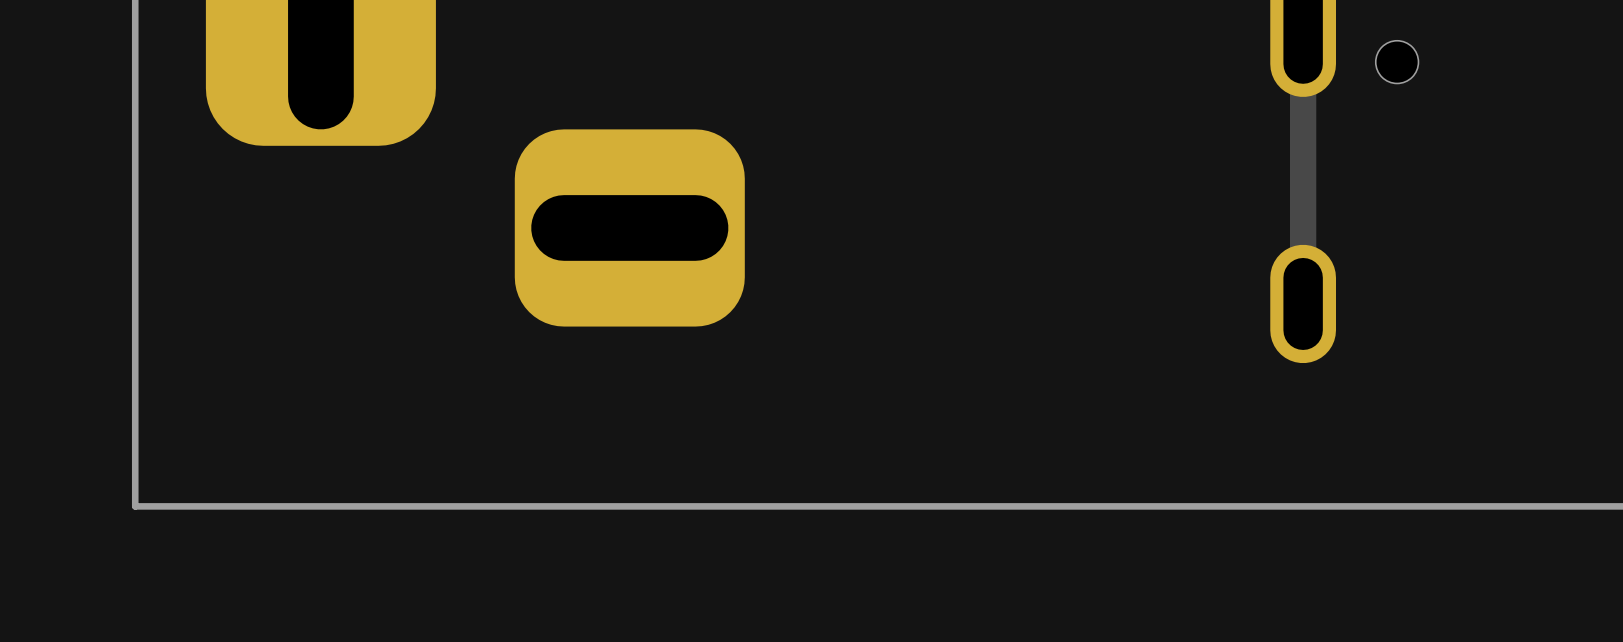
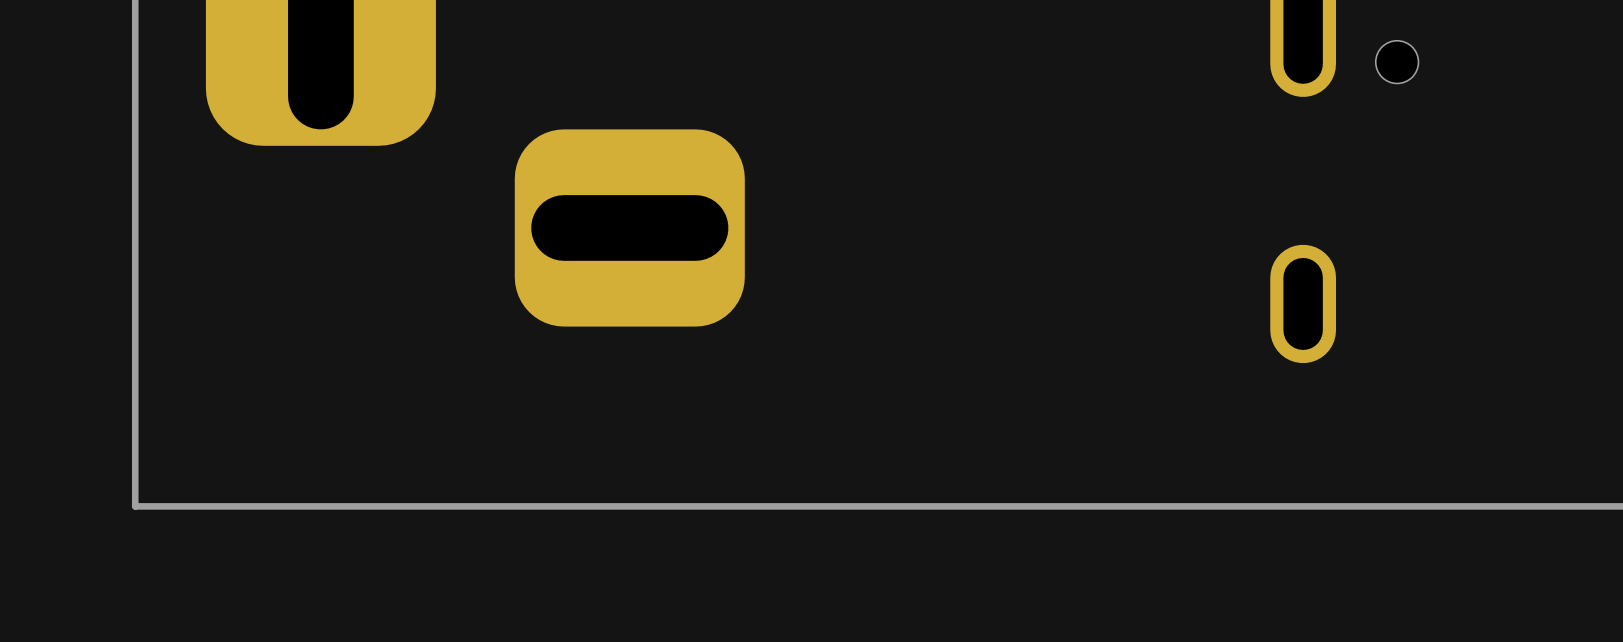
track: (1303, 27) (1303, 303) -> none

